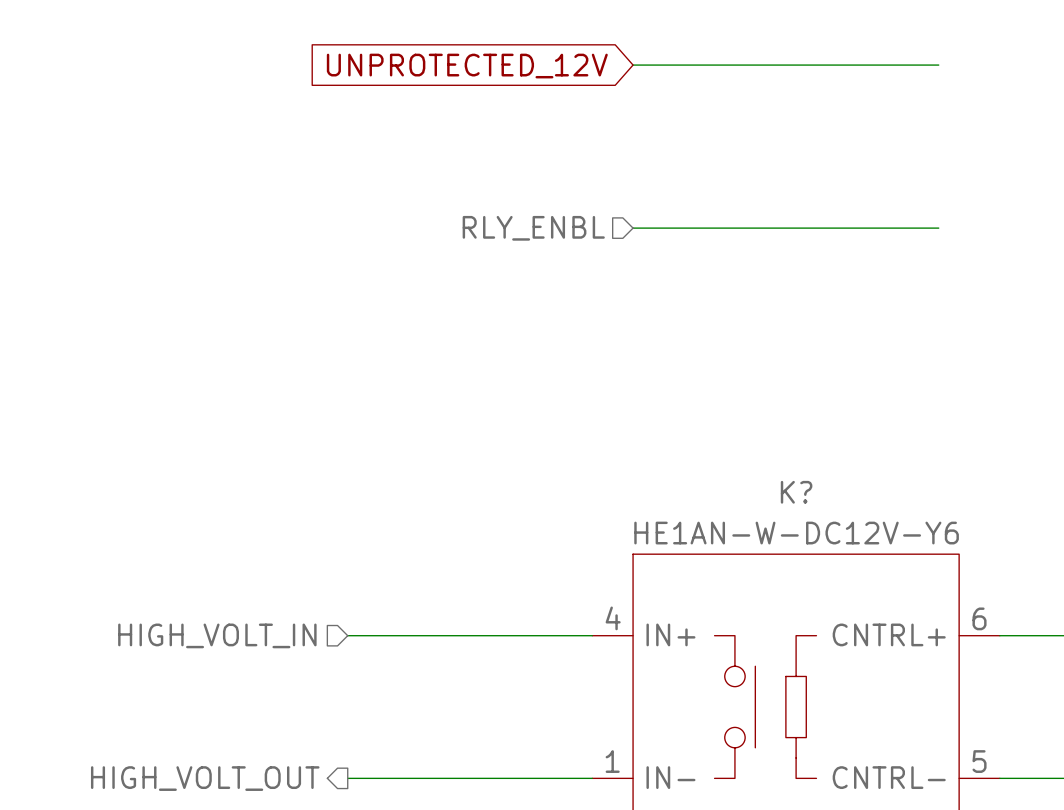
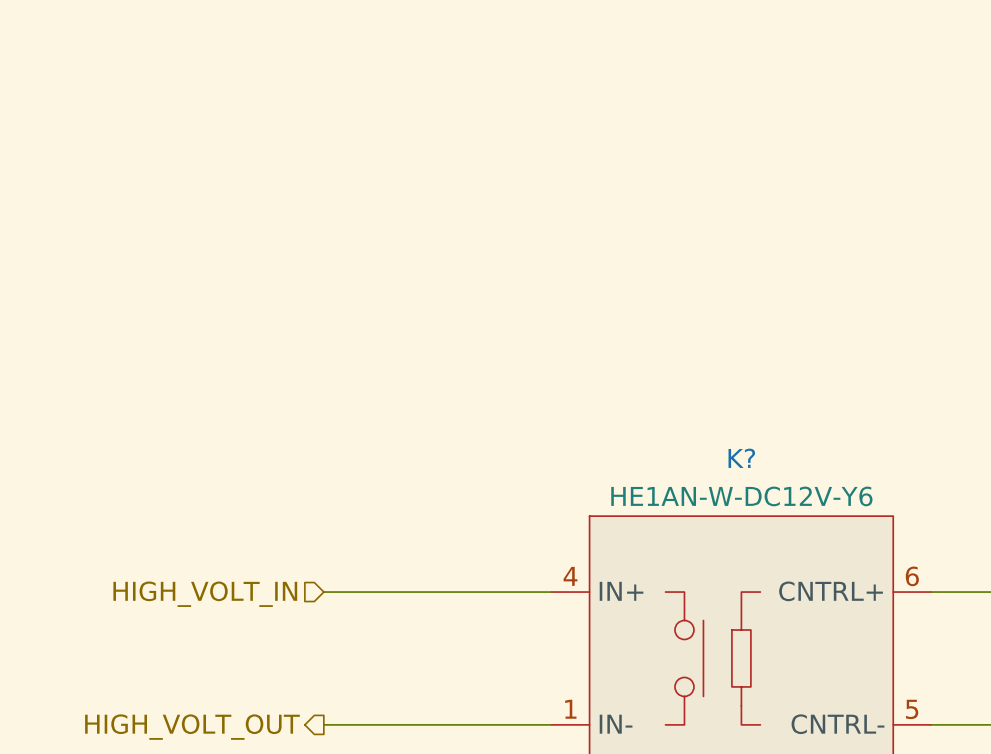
wire: (633, 65) (938, 65) -> none
global label: UNPROTECTED_12V (467, 66) -> none
hierarchical label: RLY_ENBL (533, 228) -> none
wire: (633, 228) (938, 228) -> none

